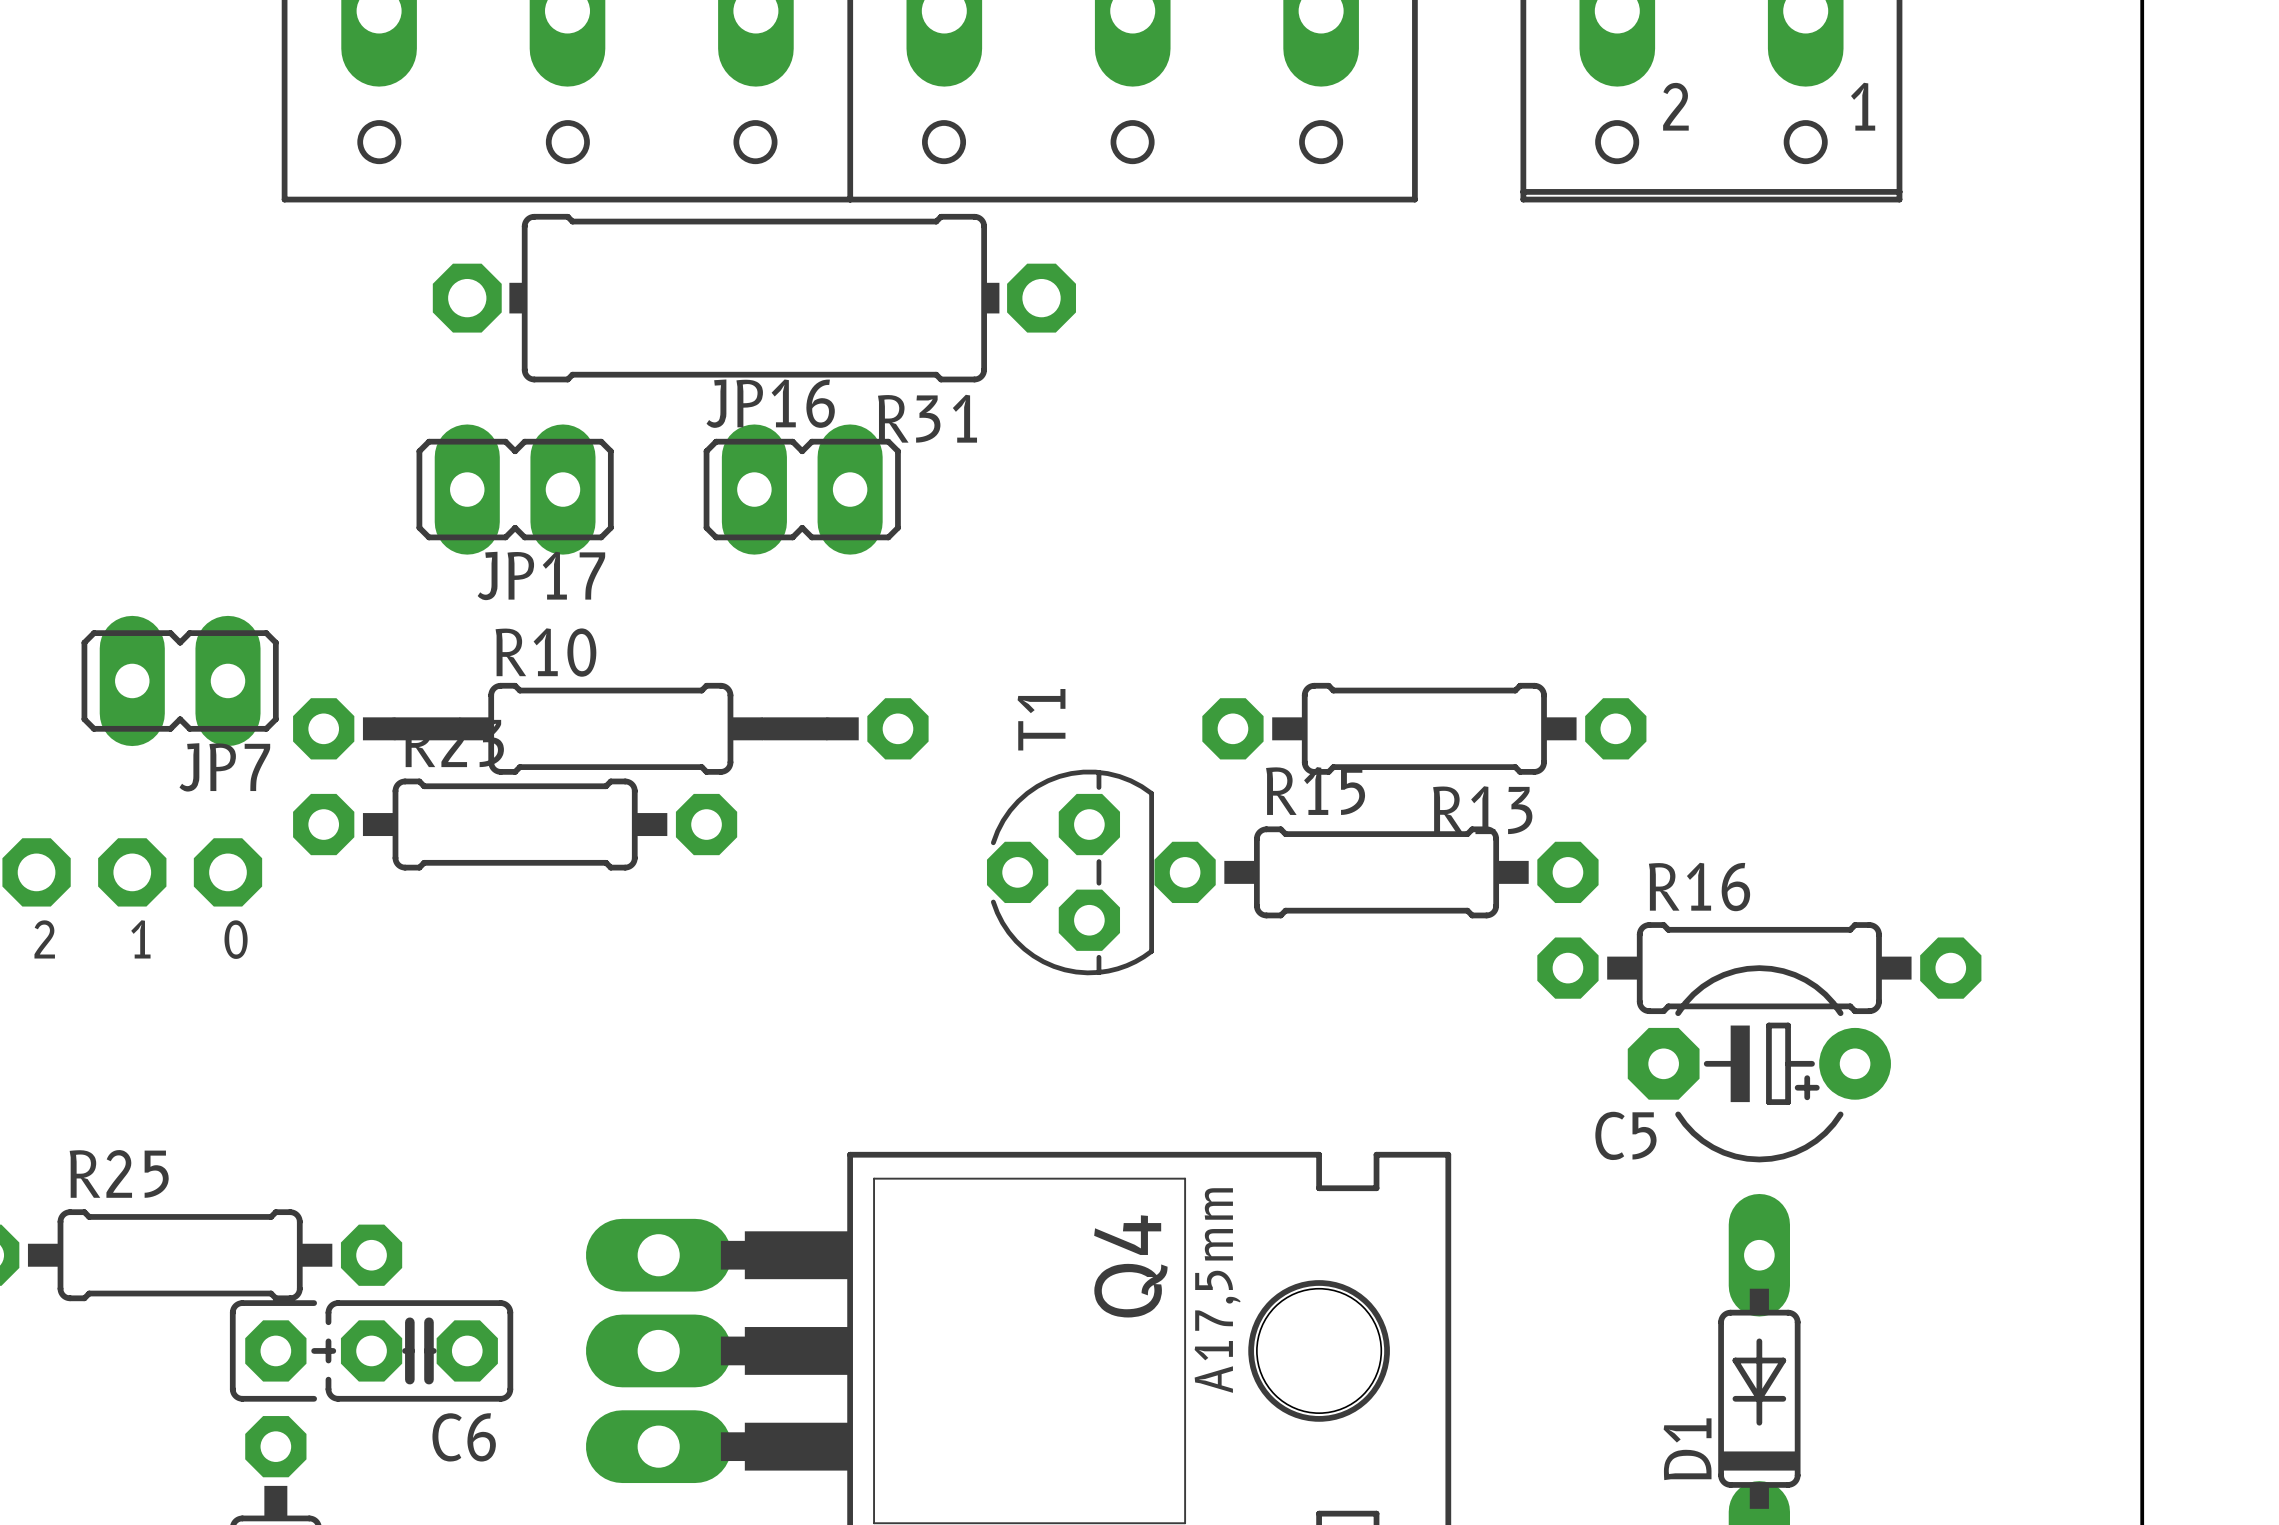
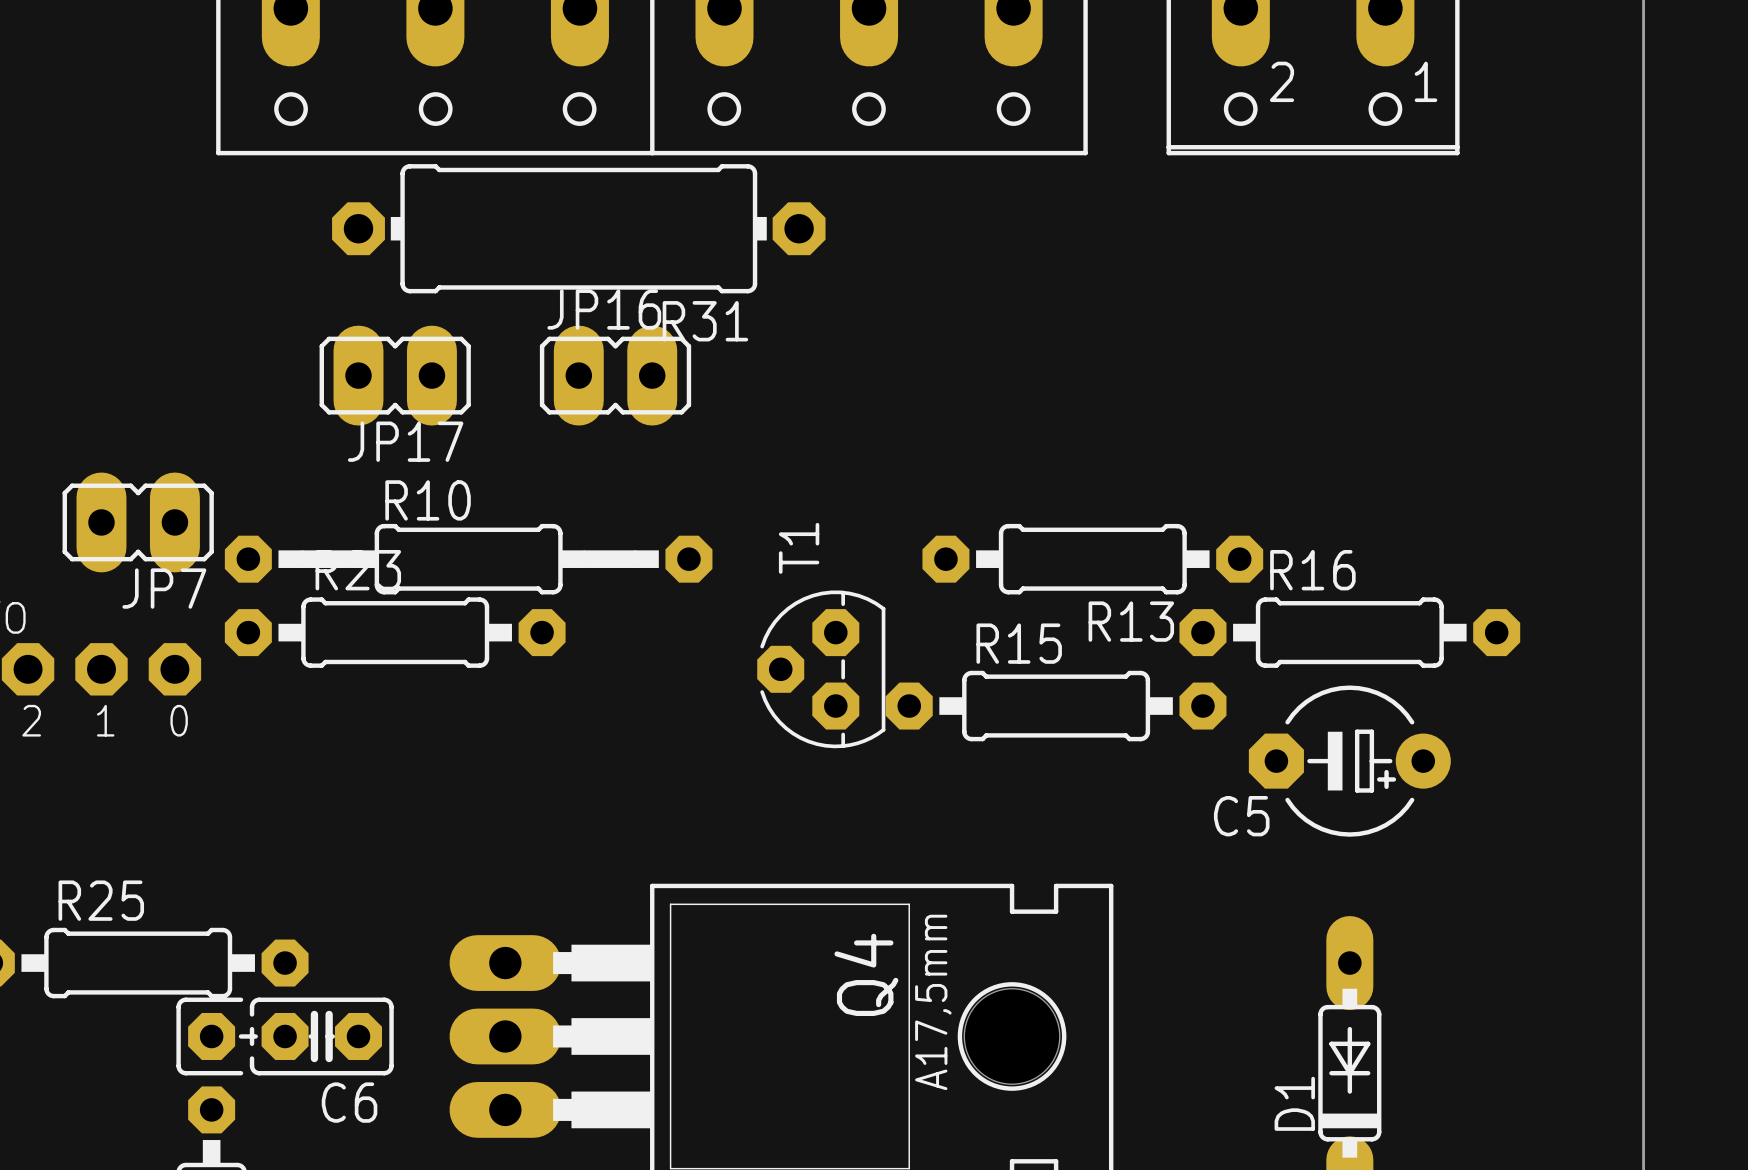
R15 position: (1376, 872) -> (1056, 706)
R16 position: (1759, 968) -> (1349, 632)
C5 position: (1759, 1063) -> (1349, 761)

